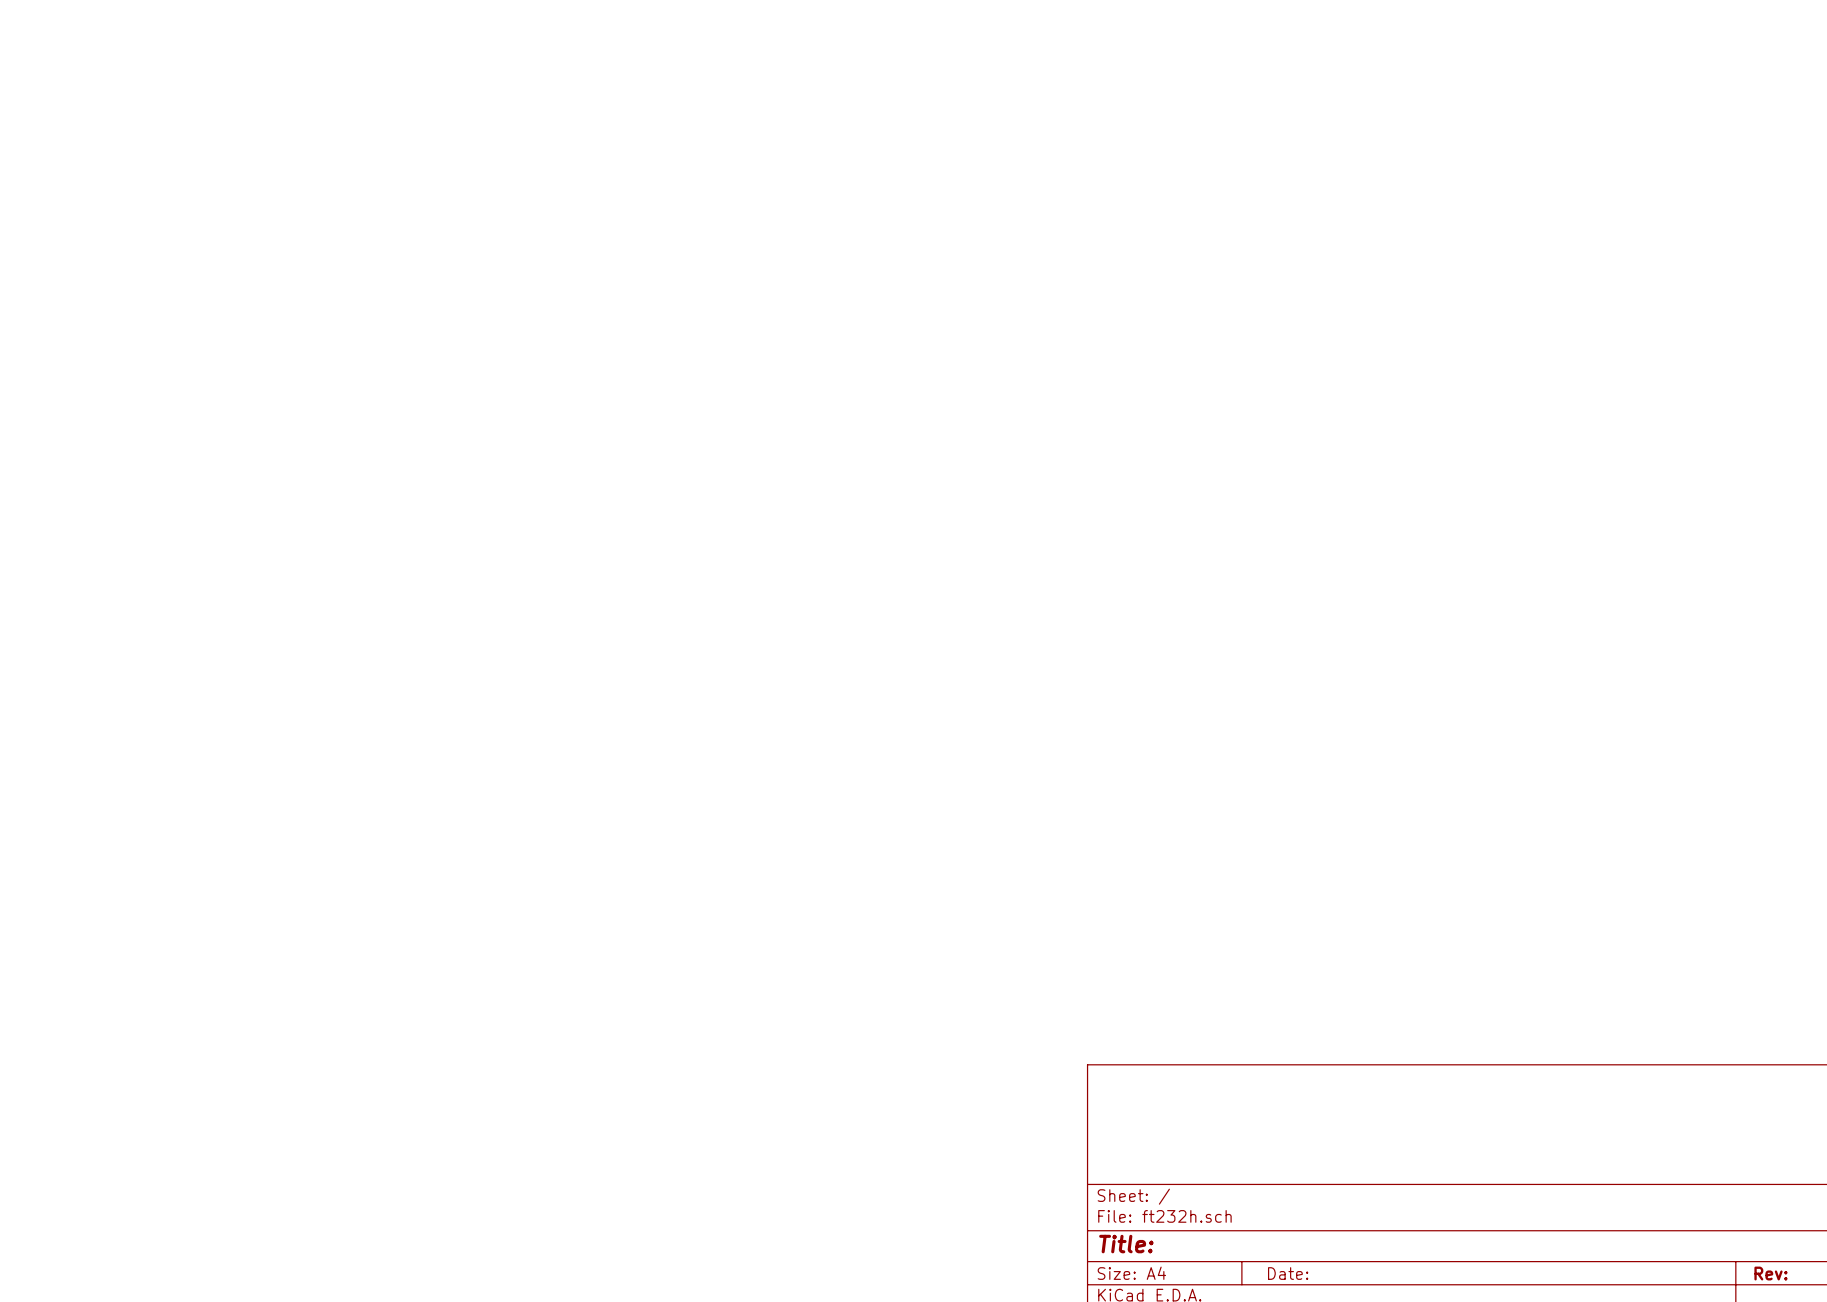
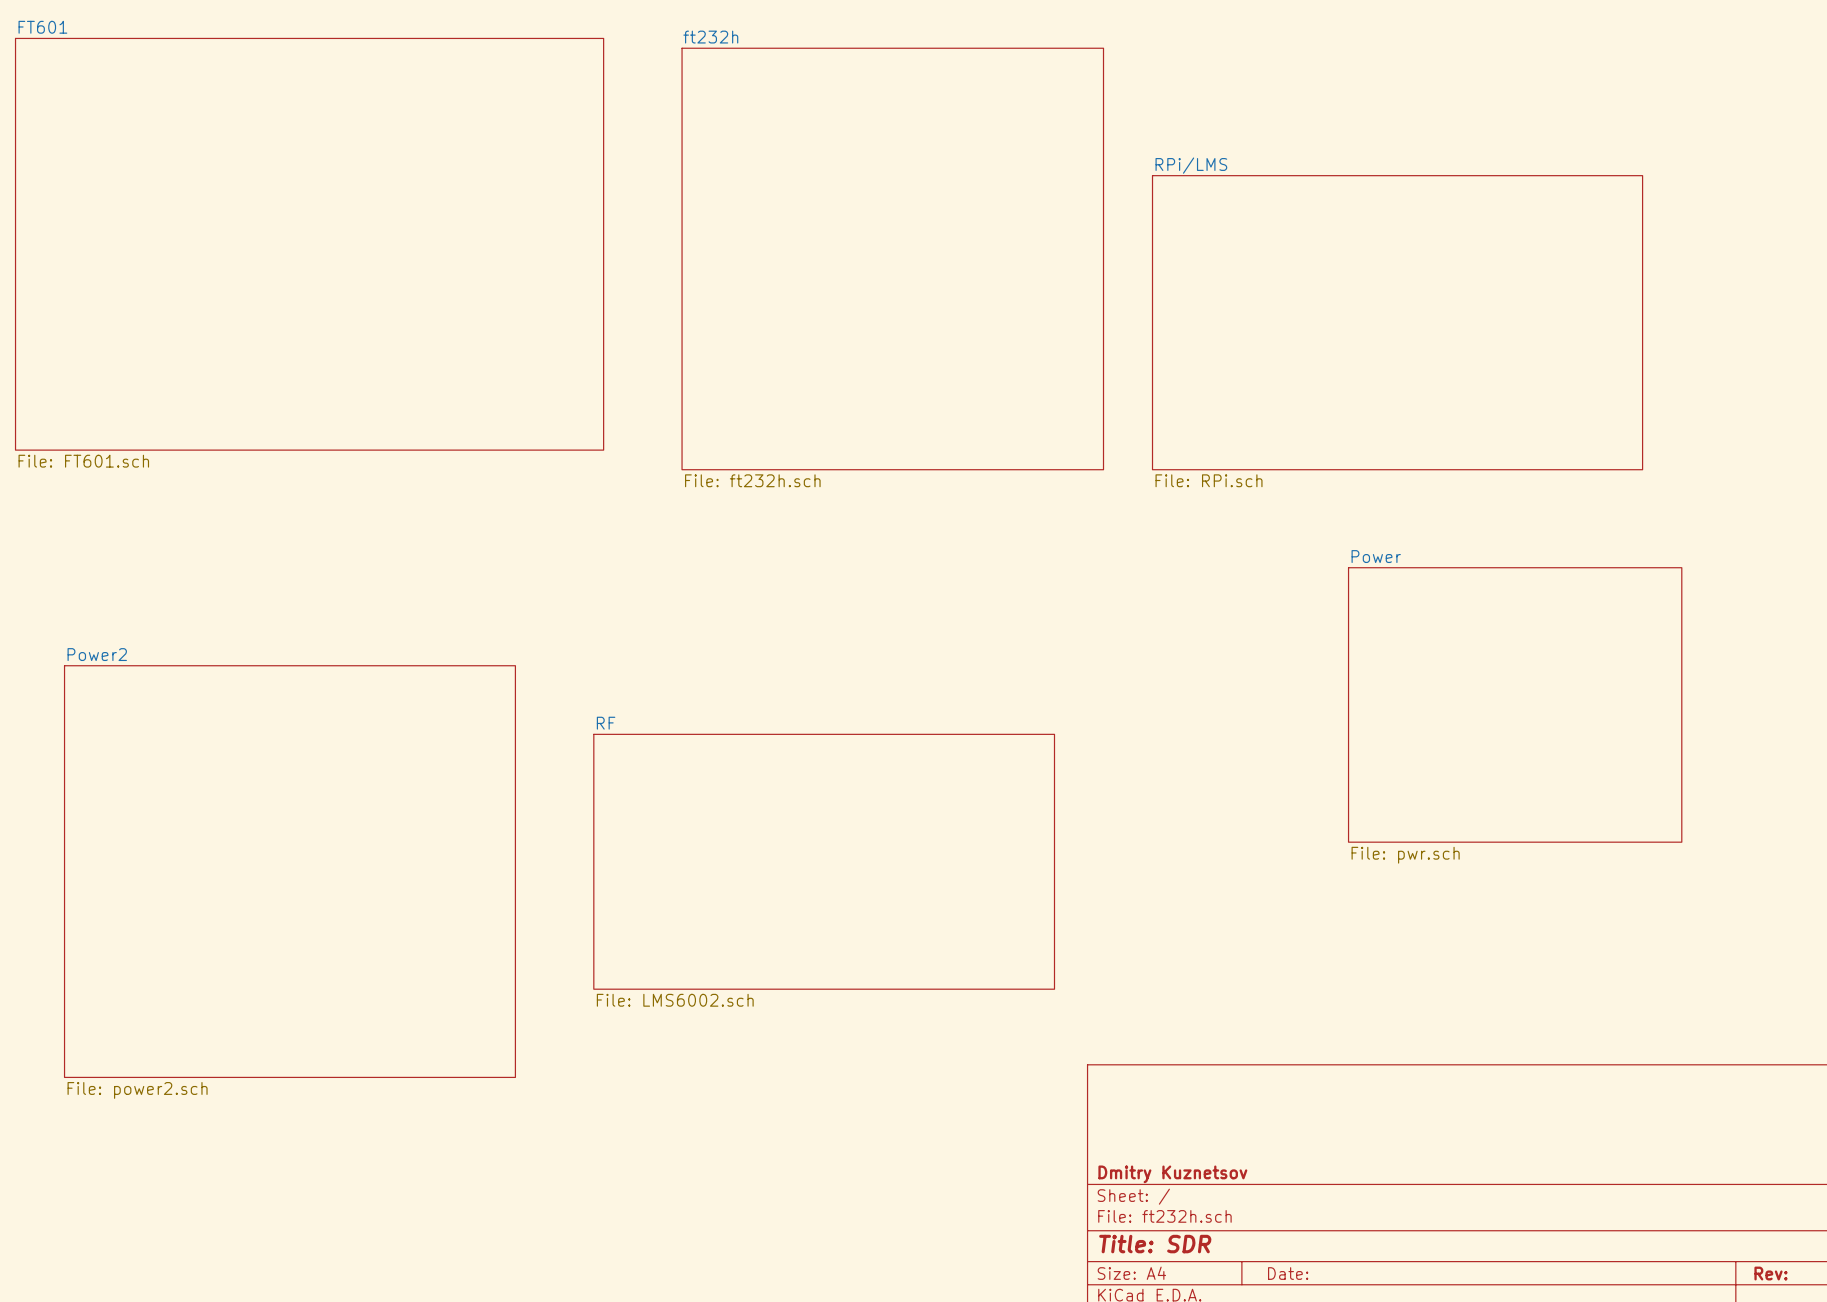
sheet FT601: none -> File: FT601.sch (309, 244)
sheet ft232h: none -> File: ft232h.sch (892, 258)
sheet RPi/LMS: none -> File: RPi.sch (1397, 322)
sheet Power: none -> File: pwr.sch (1515, 704)
sheet RF: none -> File: LMS6002.sch (824, 861)
sheet Power2: none -> File: power2.sch (289, 871)
title block: none -> Dmitry Kuznetsov (1172, 1174)
title block: Title: (1126, 1244) -> Title: SDR (1155, 1244)

